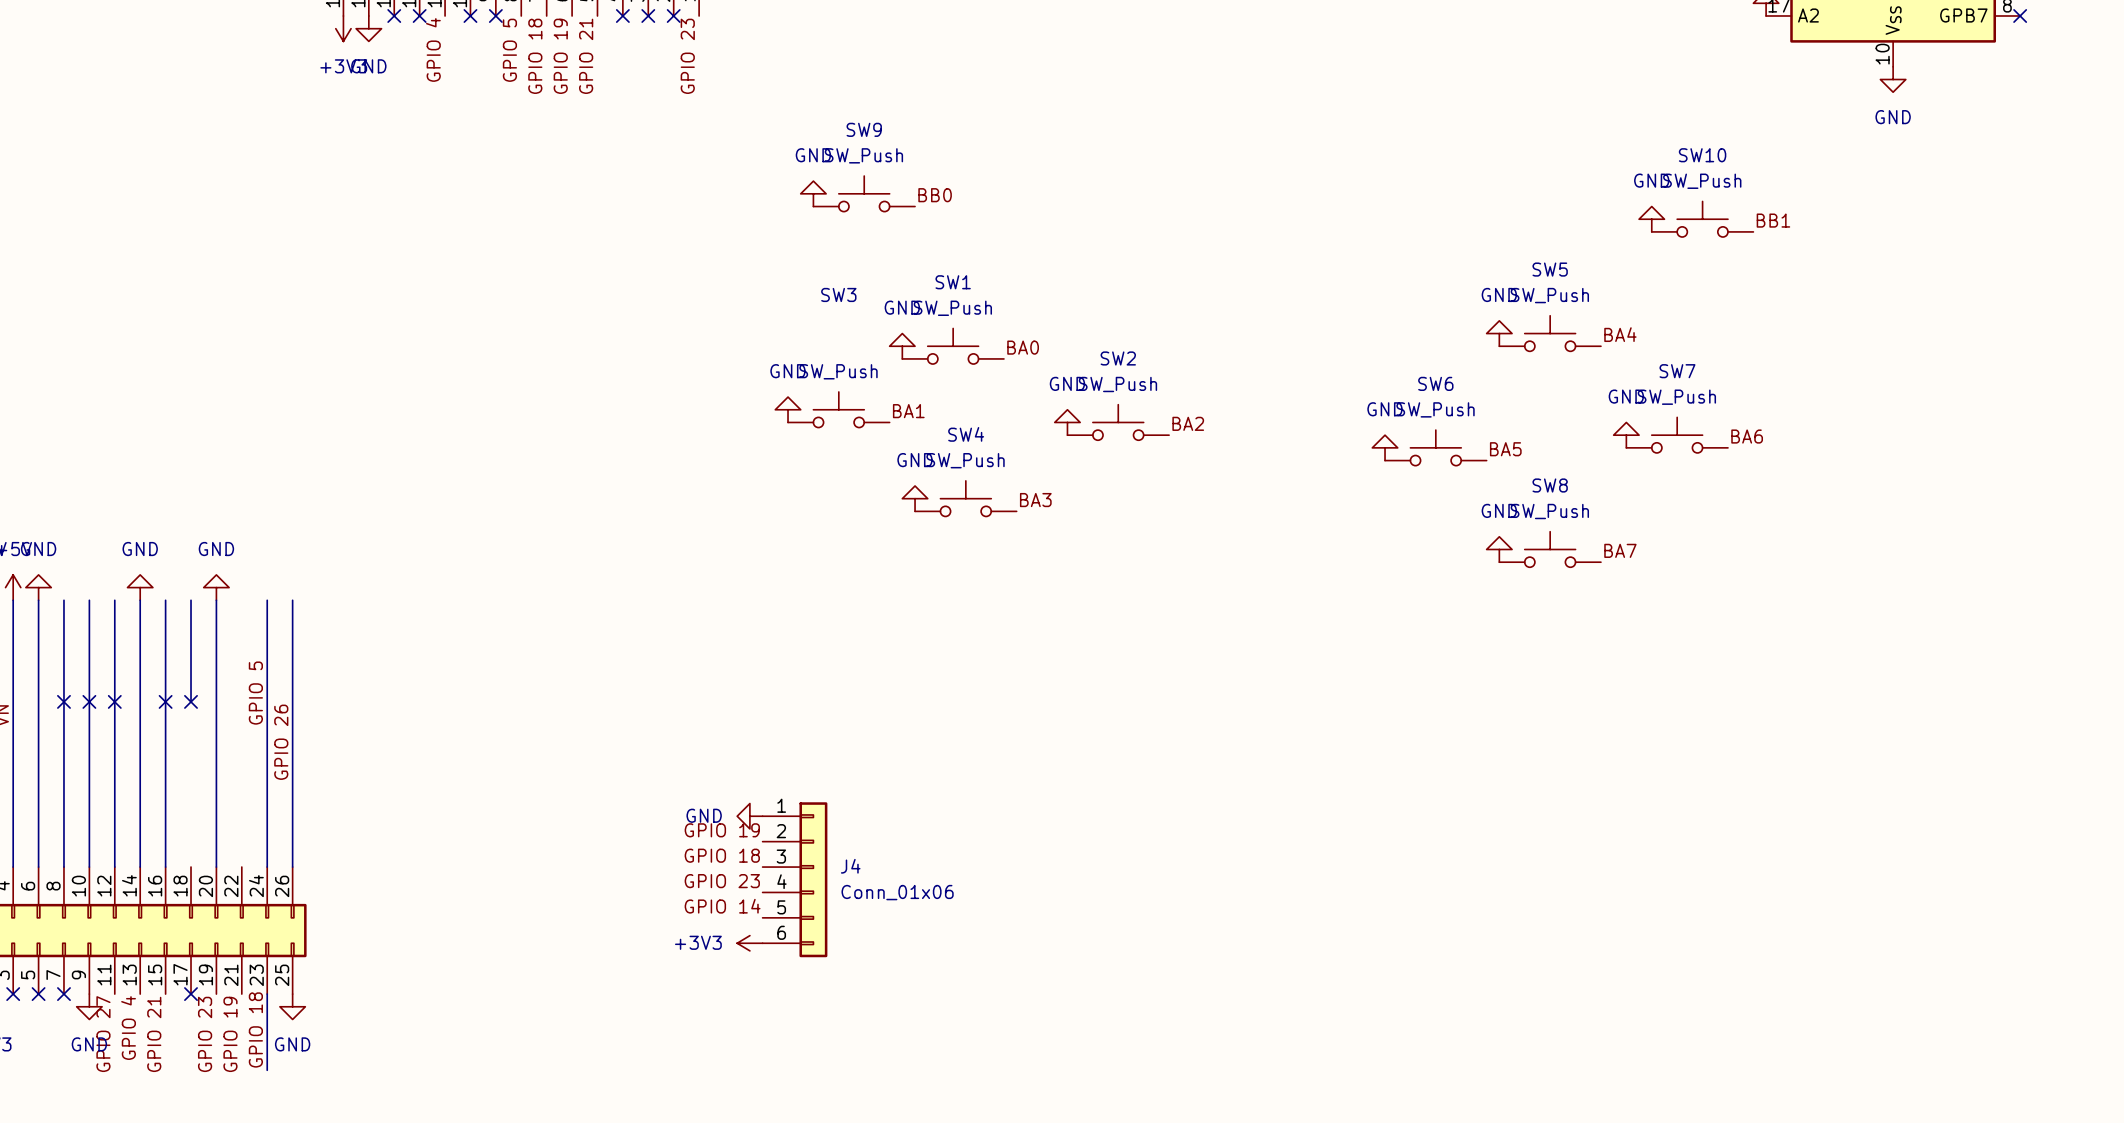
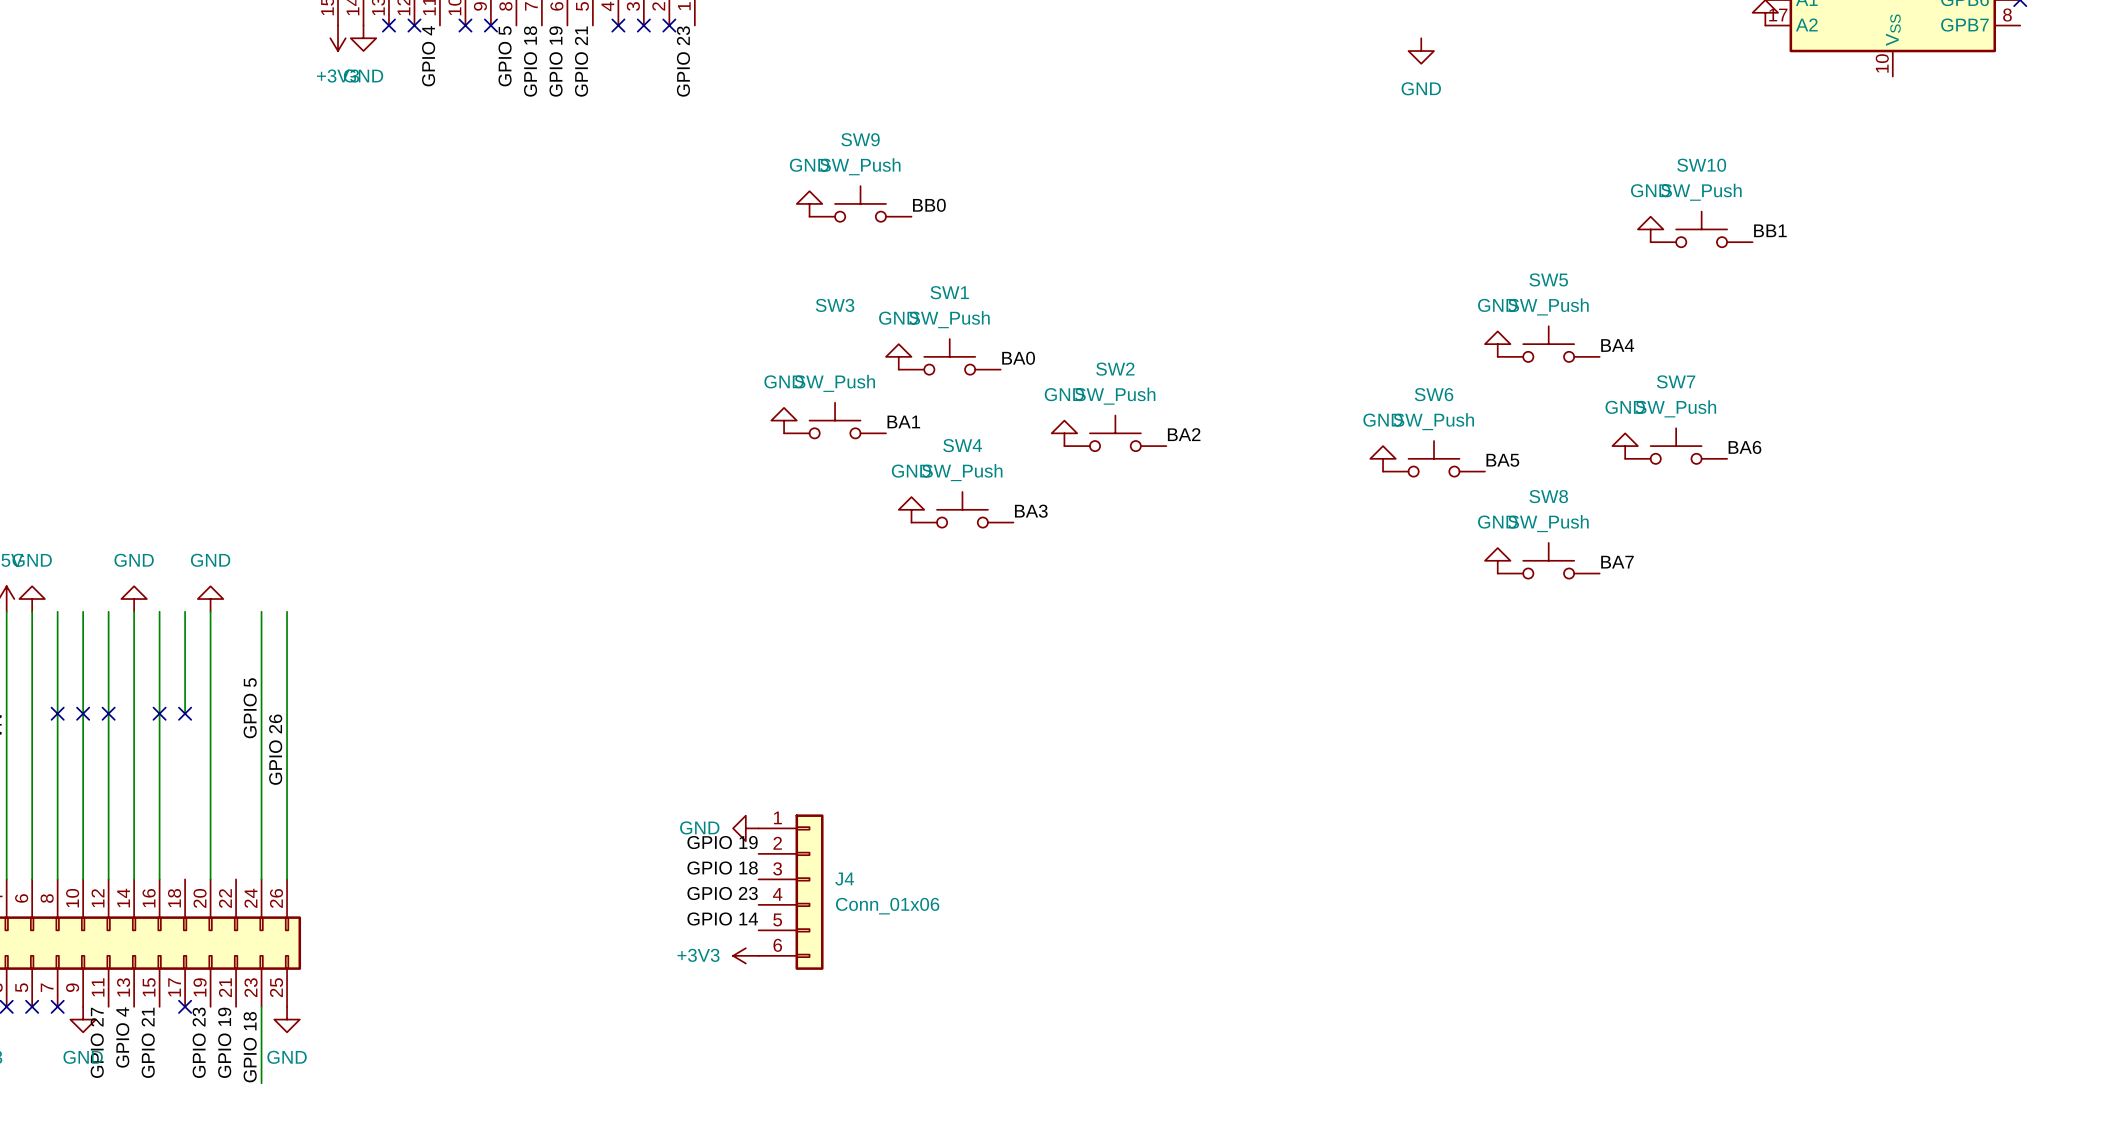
no-connect mark: (2020, 15) -> none
power symbol: none -> GND (1421, 51)
power symbol: GND (1893, 79) -> none

